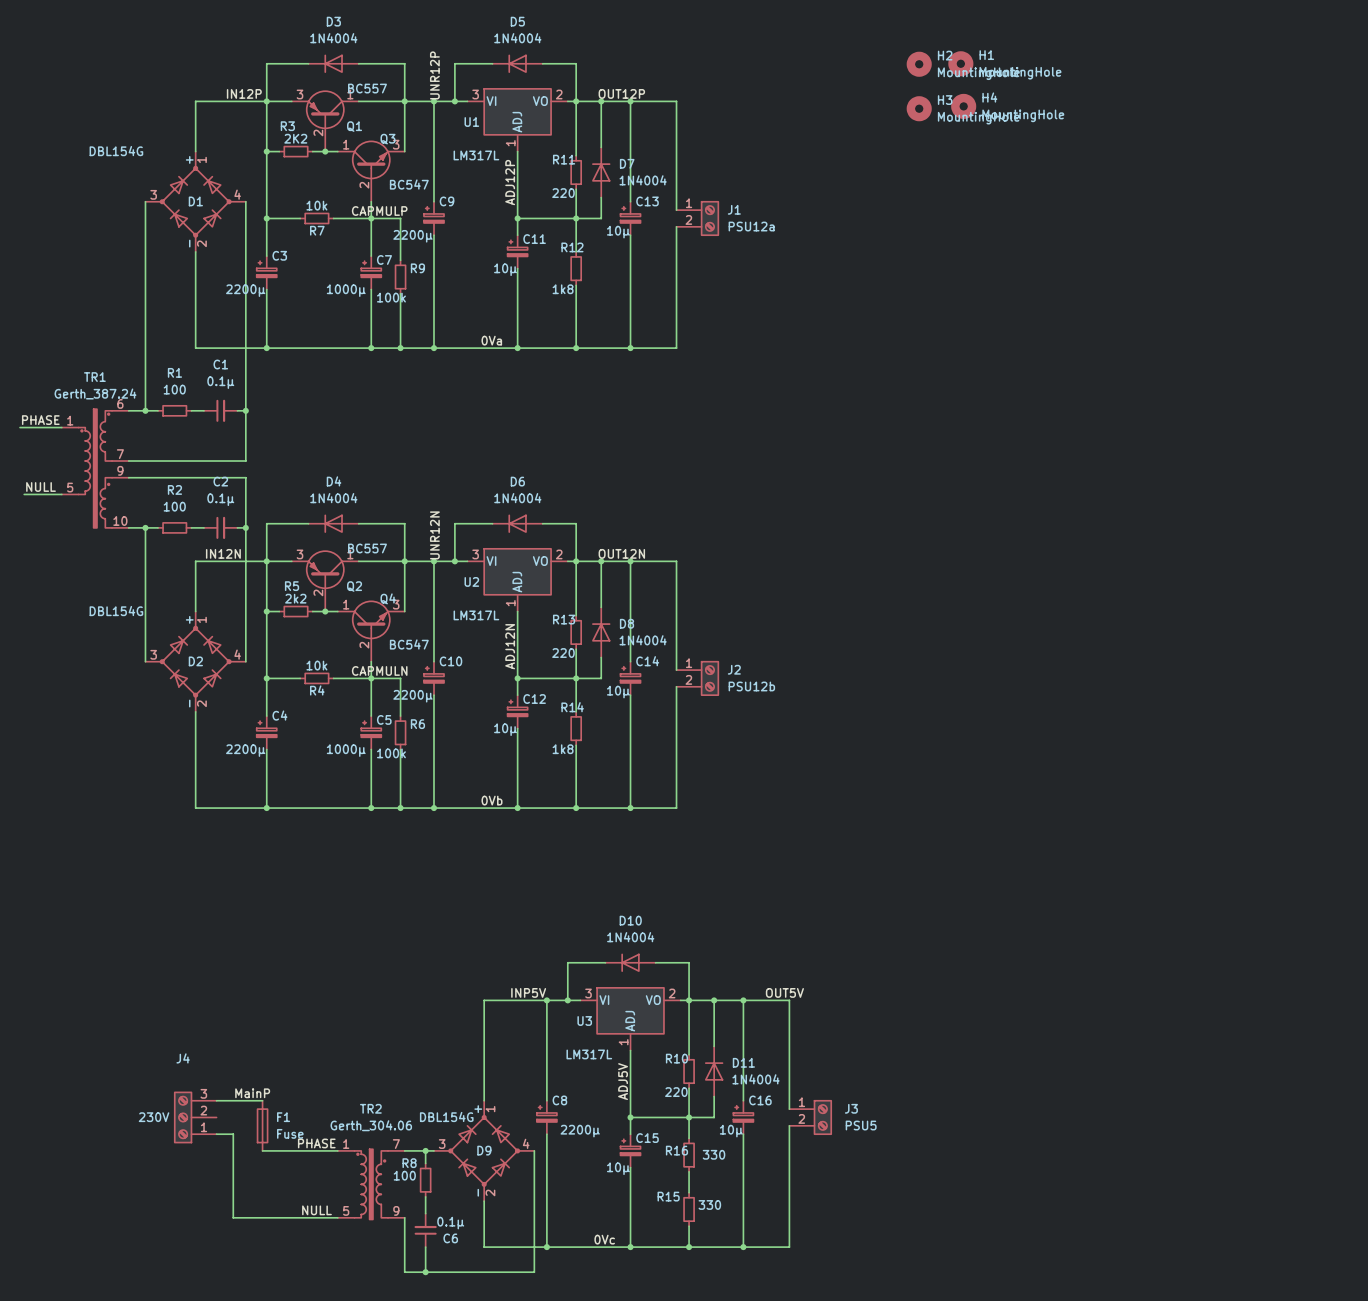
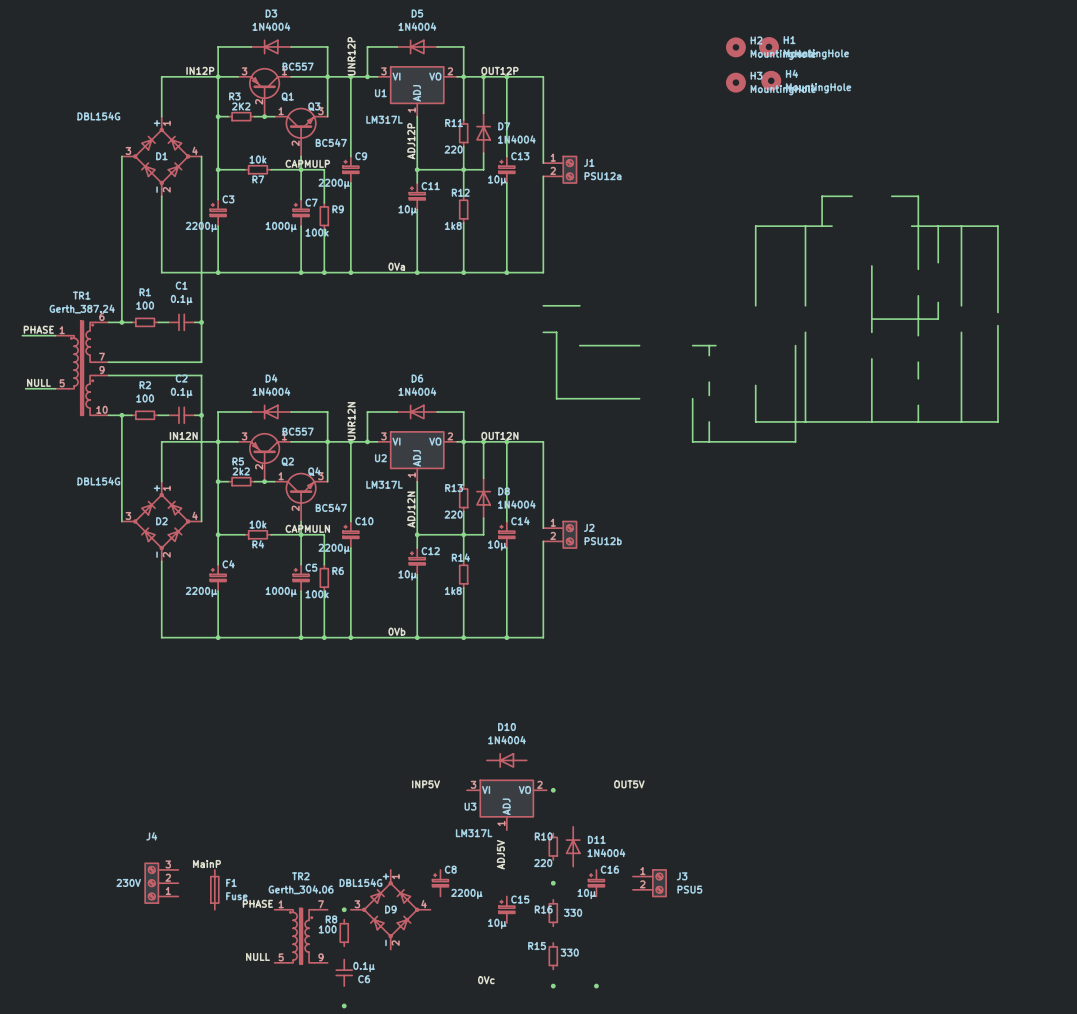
wire: none -> (851, 196) (822, 196) (822, 226)
wire: none -> (891, 196) (918, 196) (918, 269)
wire: none -> (805, 226) (805, 305)
wire: none -> (832, 226) (755, 226) (755, 305)
wire: none -> (911, 226) (997, 226) (997, 312)
wire: none -> (938, 226) (938, 262)
wire: none -> (961, 226) (961, 305)
wire: none -> (871, 265) (871, 332)
wire: none -> (918, 295) (918, 335)
wire: none -> (938, 302) (938, 319) (871, 319)
wire: none -> (543, 305) (579, 305)
wire: none -> (997, 325) (997, 421) (755, 421) (755, 385)
wire: none -> (543, 332) (556, 332) (556, 398) (639, 398)
wire: none -> (805, 332) (805, 421)
wire: none -> (961, 332) (961, 421)
wire: none -> (579, 345) (639, 345)
wire: none -> (692, 345) (715, 345)
wire: none -> (709, 345) (709, 355)
wire: none -> (795, 345) (795, 441) (692, 441) (692, 398)
wire: none -> (871, 358) (871, 421)
wire: none -> (918, 362) (918, 378)
wire: none -> (709, 382) (709, 395)
wire: none -> (918, 405) (918, 421)
wire: none -> (709, 421) (709, 441)
wire: (605, 962) (567, 962) (567, 1000) -> none
wire: (655, 962) (689, 962) (689, 1054) -> none
wire: (546, 1000) (546, 1100) -> none
junction: (546, 1000) -> none
junction: (567, 1000) -> none
wire: (580, 1000) (484, 1000) (484, 1100) -> none
wire: (680, 1000) (789, 1000) (789, 1109) -> none
wire: (714, 1000) (714, 1046) -> none
junction: (714, 1000) -> none
wire: (743, 1000) (743, 1100) -> none
junction: (743, 1000) -> none
wire: (630, 1050) (630, 1134) -> none
wire: (689, 1088) (689, 1138) -> none
wire: (714, 1096) (714, 1117) (630, 1117) -> none
wire: (216, 1100) (262, 1100) -> none
junction: (630, 1117) -> none
wire: (789, 1125) (789, 1247) (484, 1247) (484, 1201) -> none
wire: (216, 1134) (233, 1134) (233, 1217) (337, 1217) -> none
wire: (546, 1134) (546, 1247) -> none
wire: (743, 1134) (743, 1247) -> none
wire: (262, 1150) (337, 1150) -> none
wire: (404, 1150) (433, 1150) -> none
wire: (425, 1150) (425, 1163) -> none
wire: (534, 1150) (534, 1272) (404, 1272) (404, 1217) -> none
wire: (630, 1167) (630, 1247) -> none
wire: (689, 1171) (689, 1192) -> none
wire: (425, 1196) (425, 1213) -> none
wire: (689, 1226) (689, 1247) -> none
wire: (425, 1247) (425, 1272) -> none
junction: (546, 1247) -> none
junction: (630, 1247) -> none

